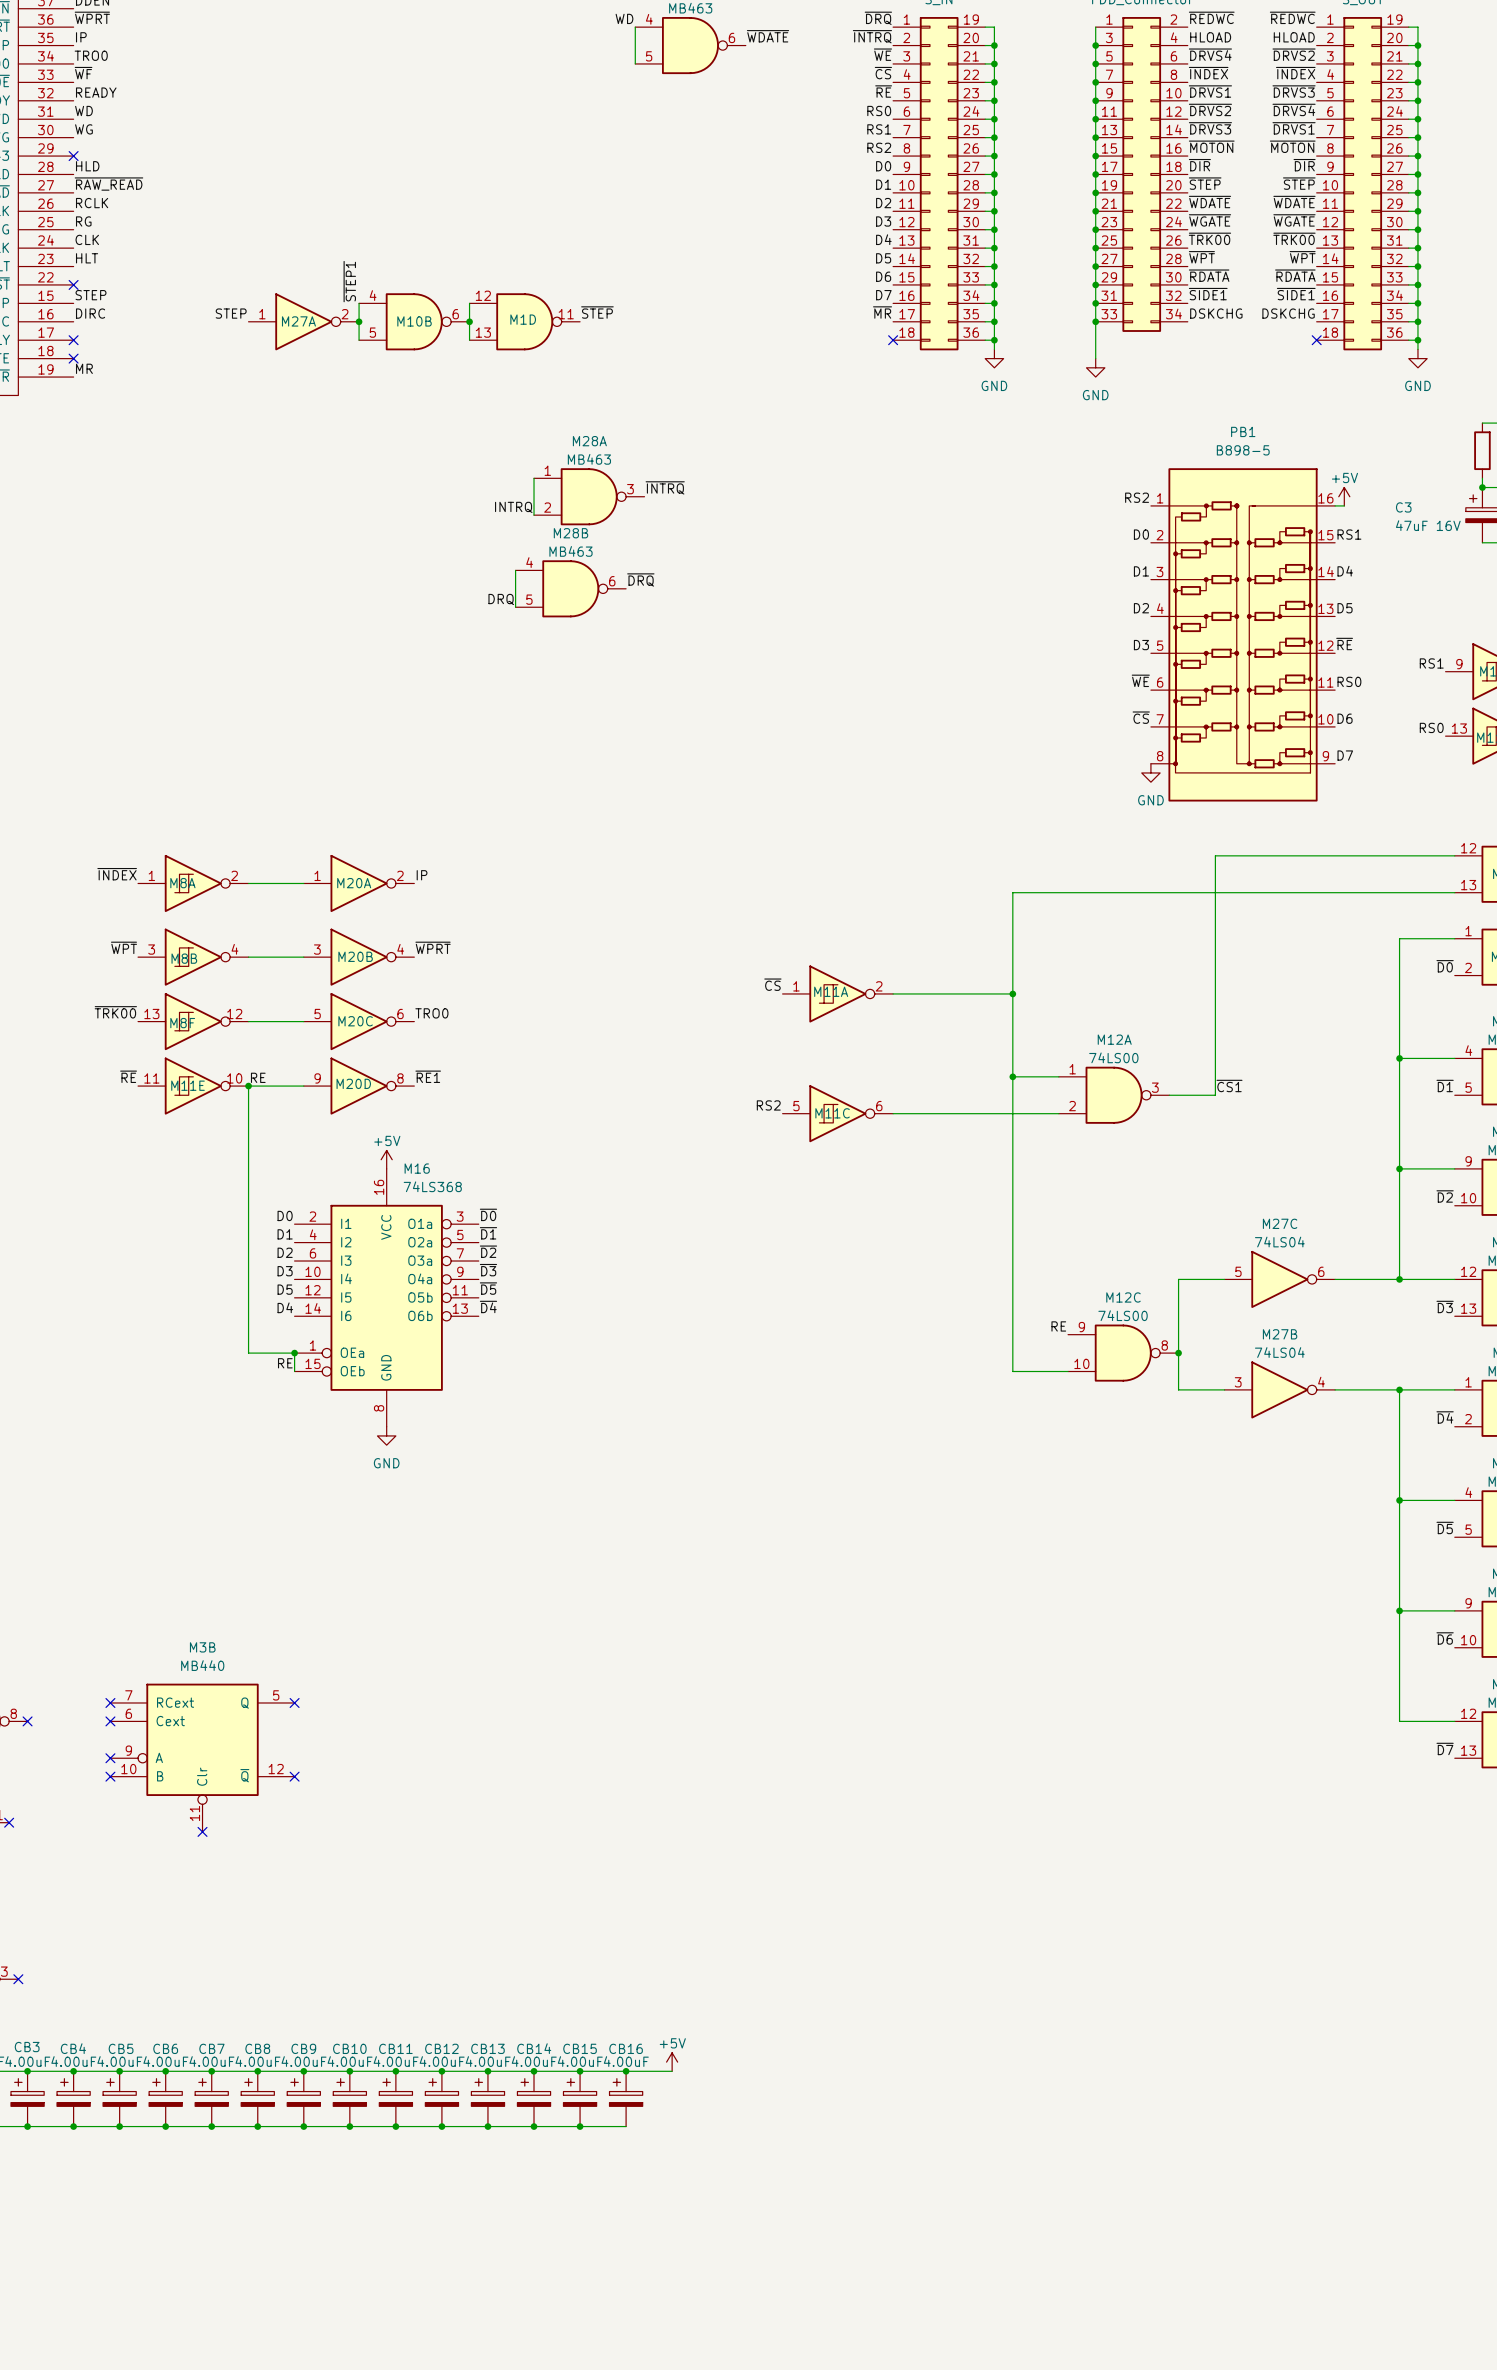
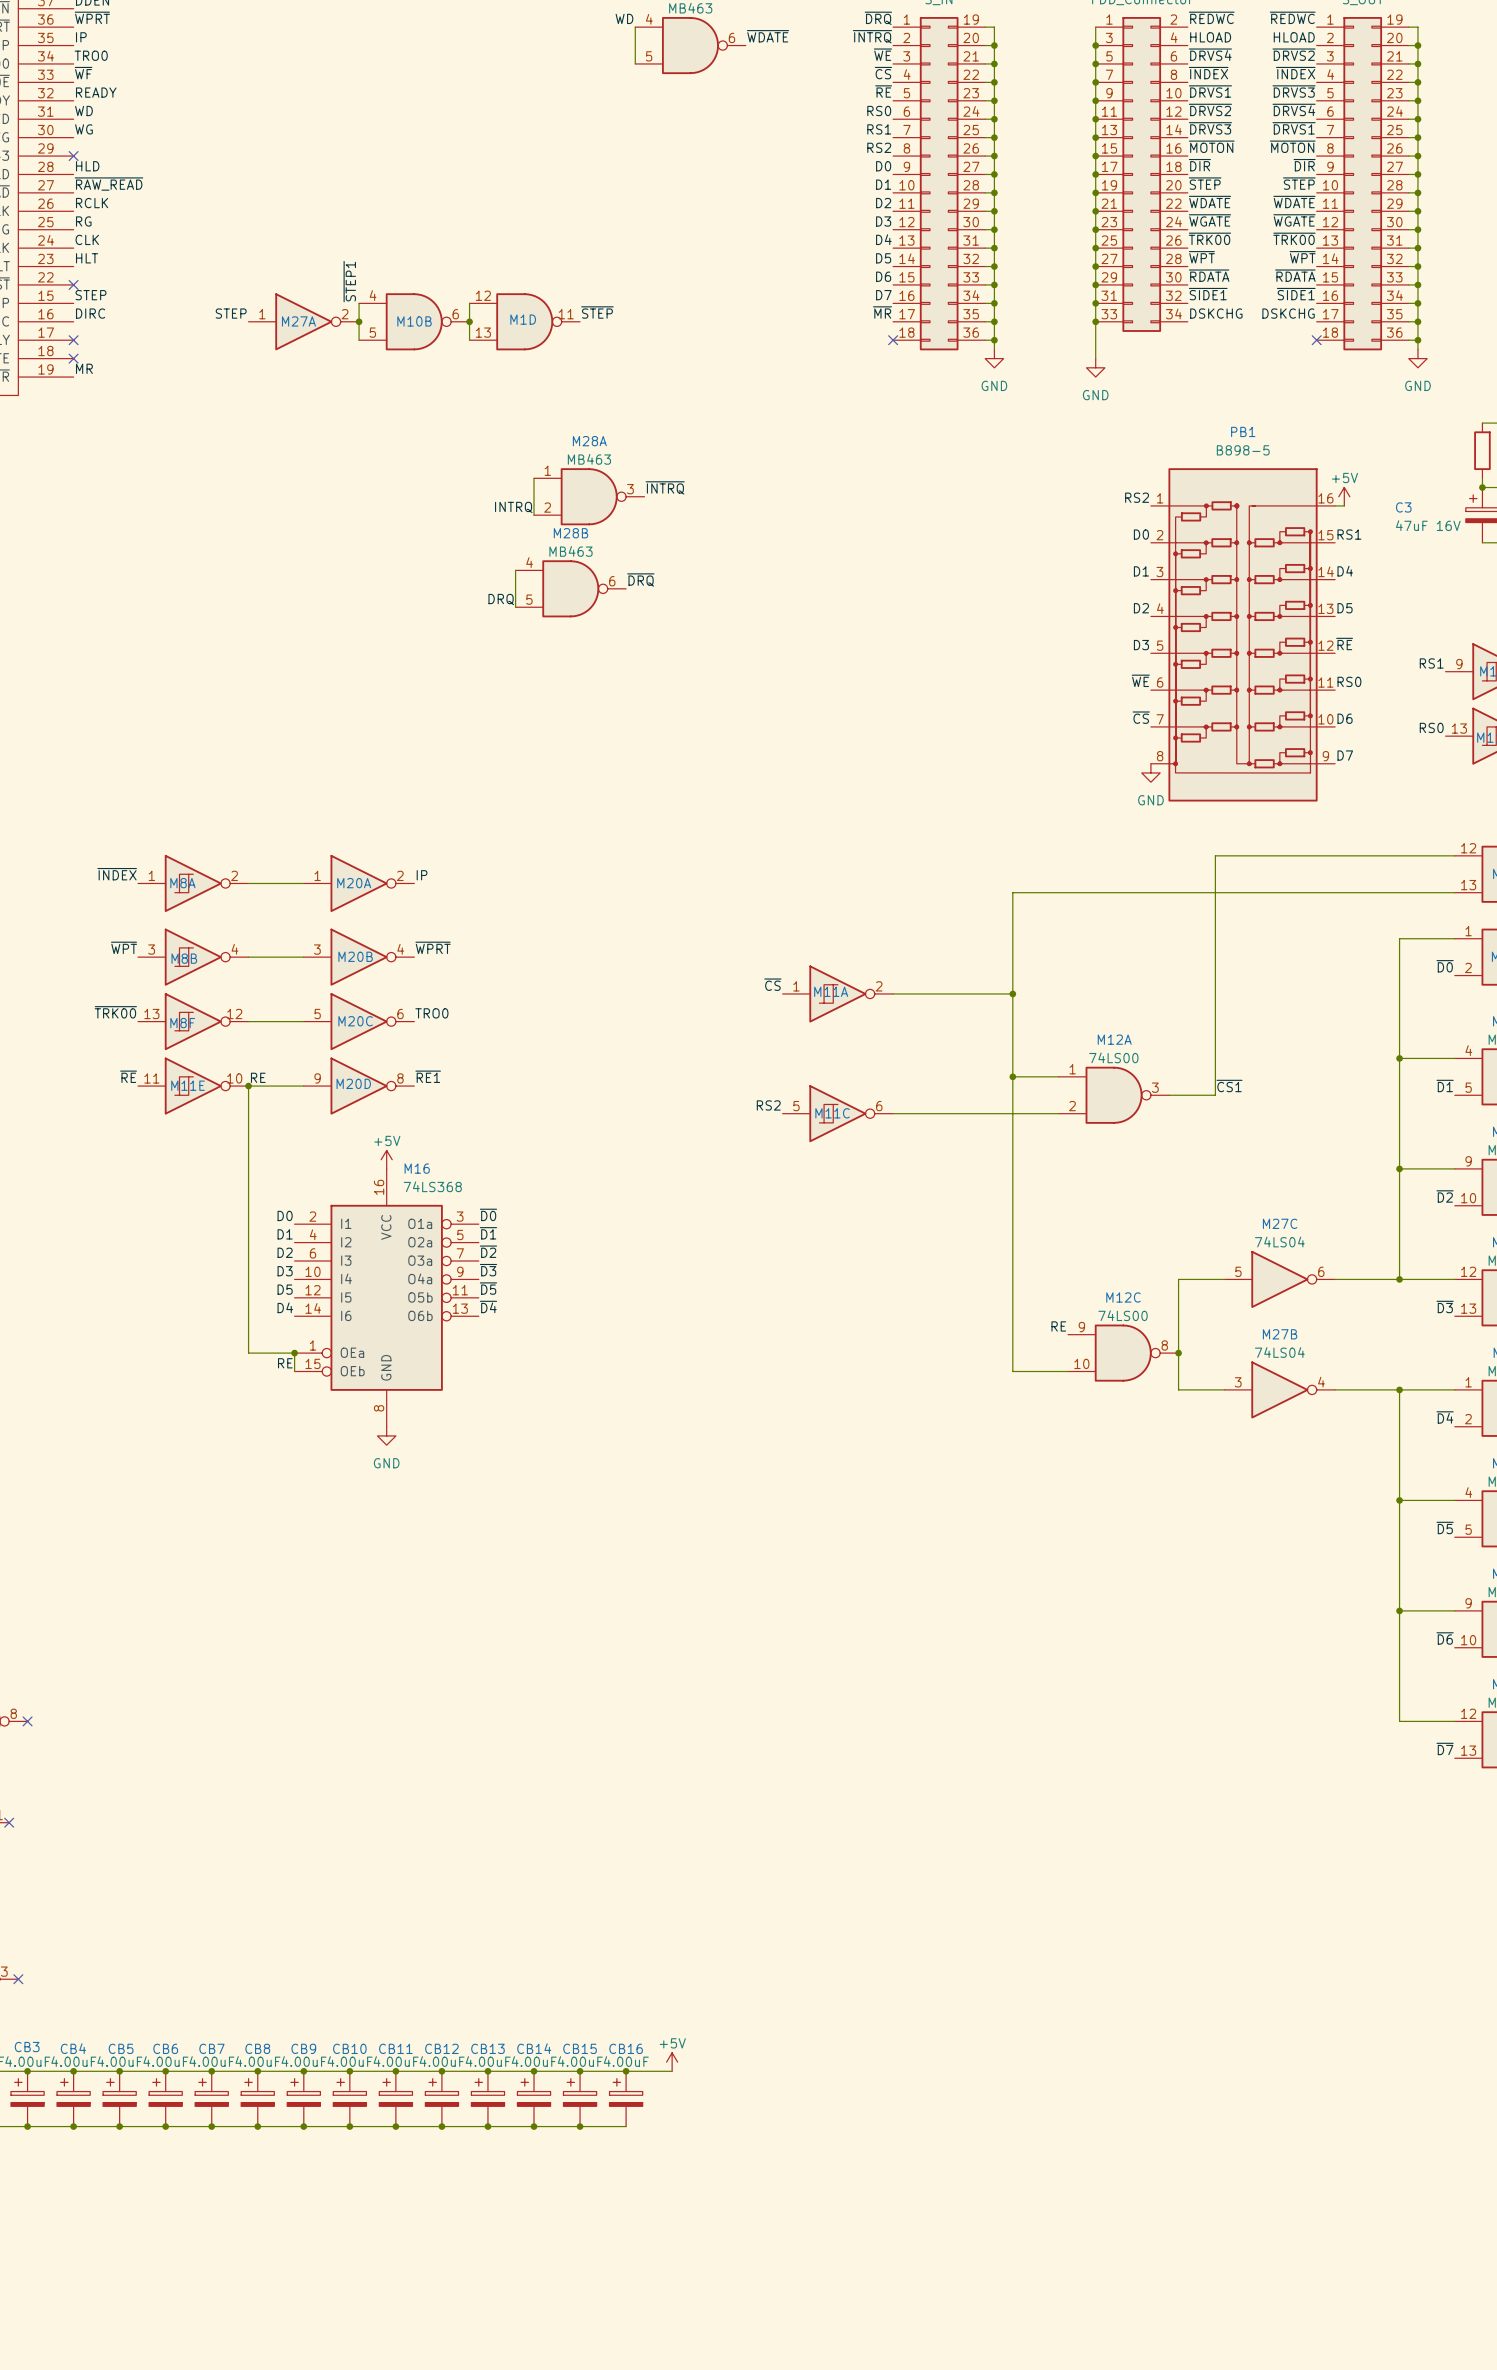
no-connect mark: (110, 1702) -> none
no-connect mark: (294, 1702) -> none
no-connect mark: (110, 1721) -> none
M3B: MB440 (202, 1757) -> none
no-connect mark: (110, 1758) -> none
no-connect mark: (110, 1776) -> none
no-connect mark: (294, 1776) -> none
no-connect mark: (202, 1831) -> none

